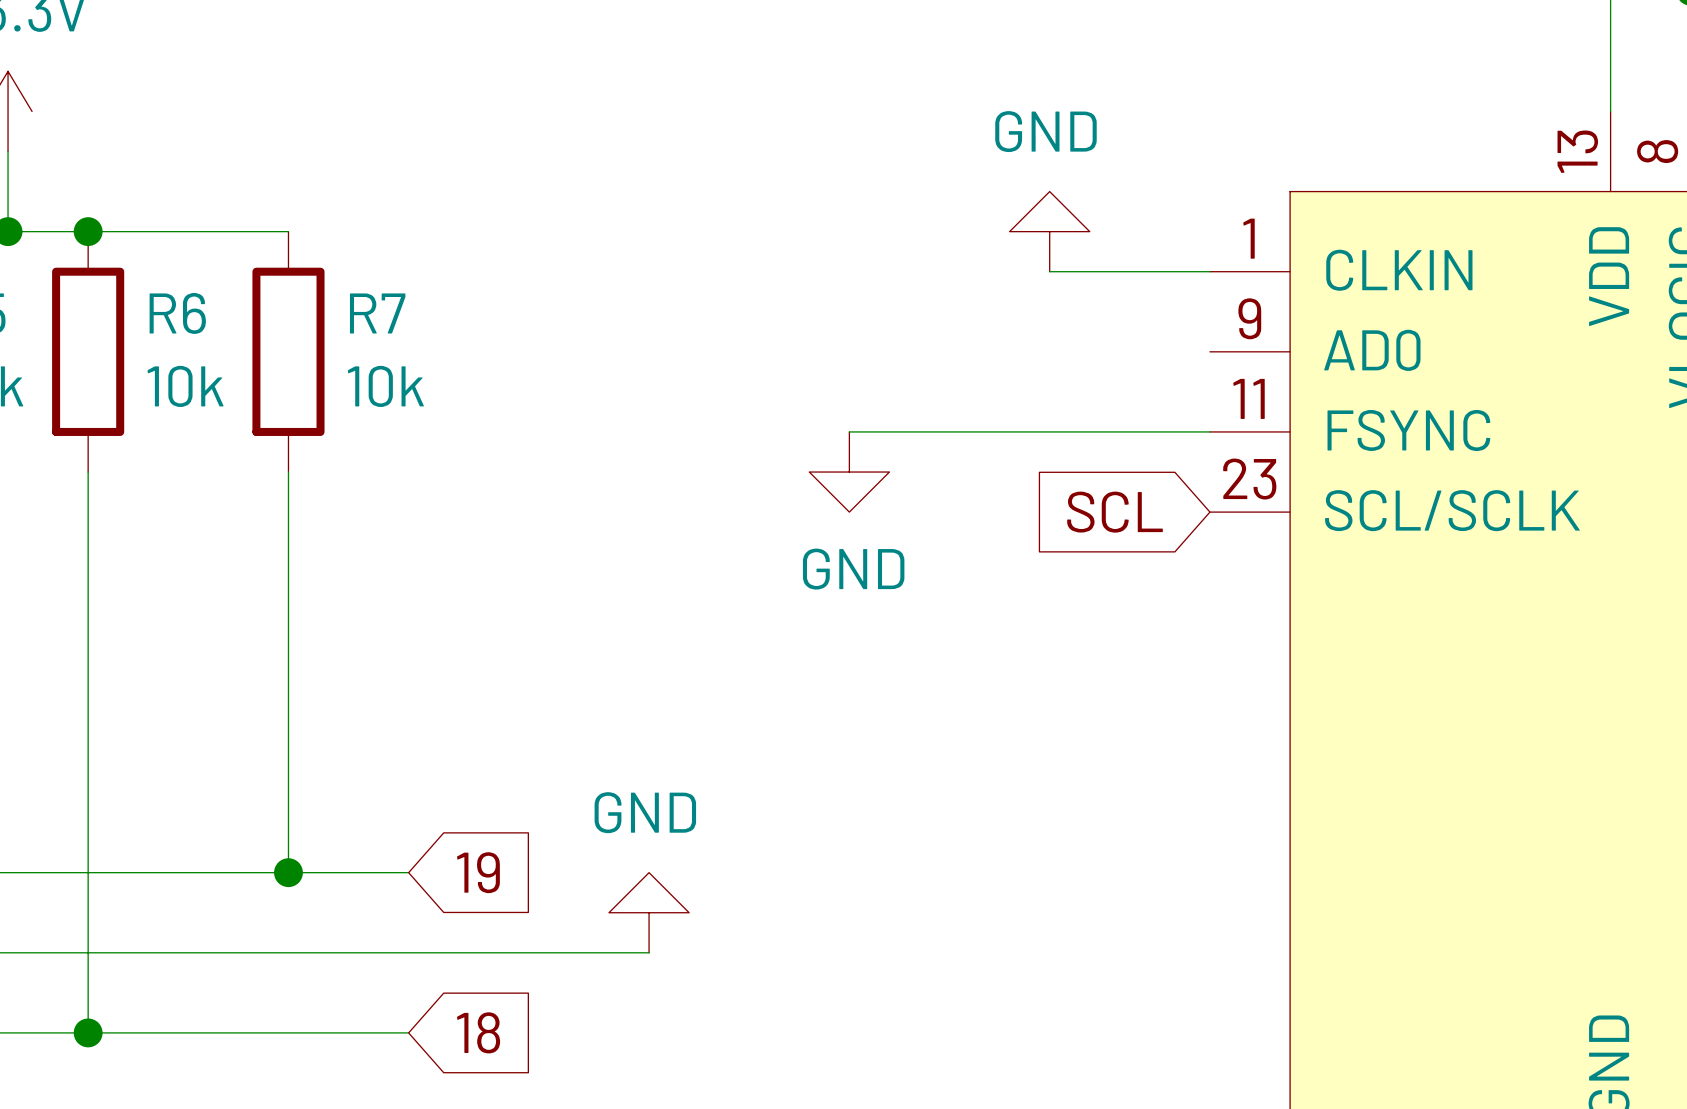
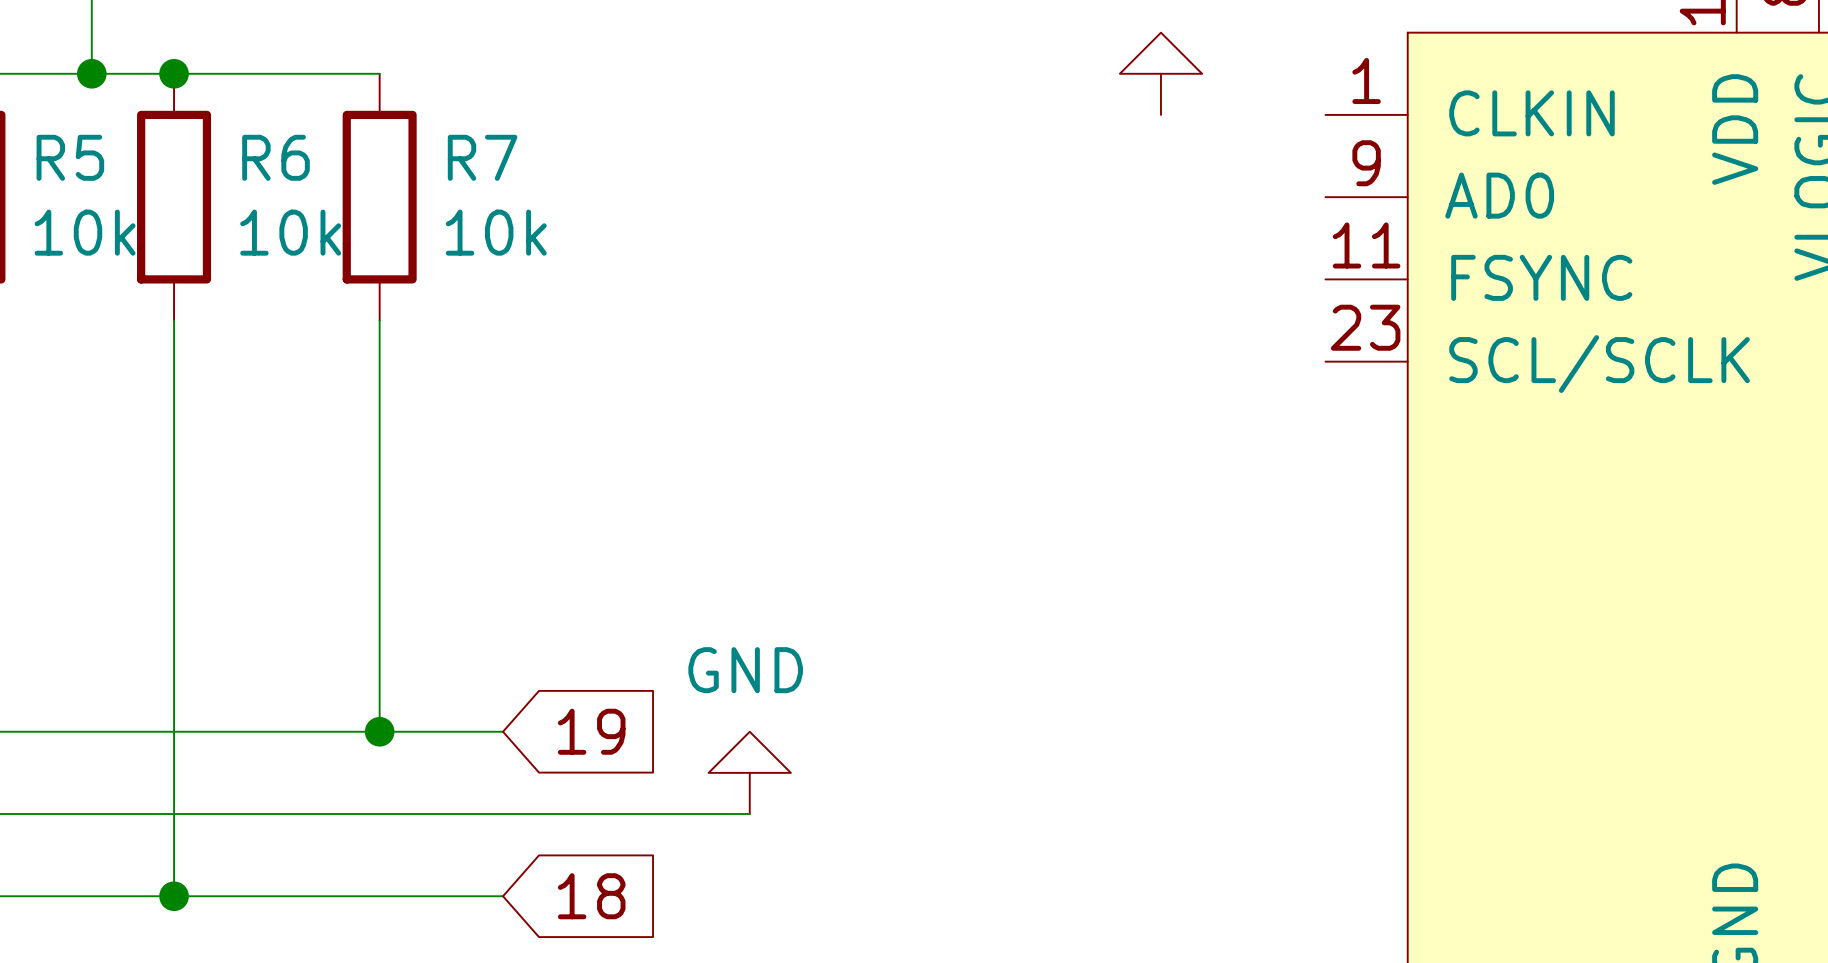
wire: (1049, 271) (1209, 271) -> none
wire: (849, 431) (1209, 431) -> none
power symbol: GND (849, 472) -> none
global label: SCL (1115, 512) -> none

